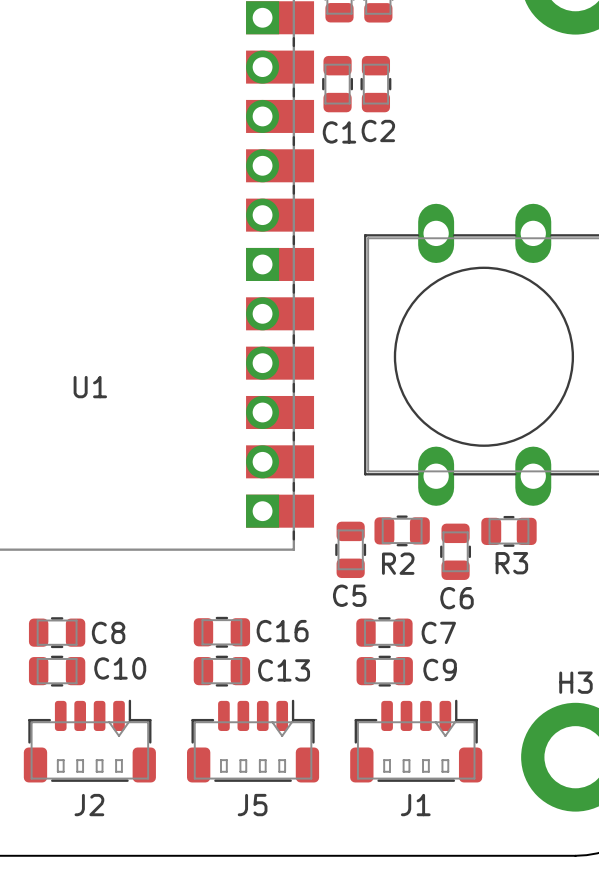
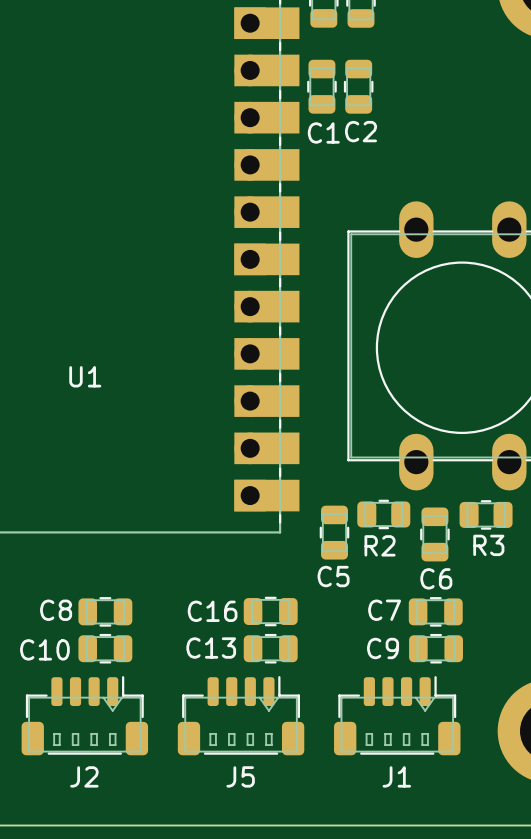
C16 name position: C16 (282, 631) -> C16 (212, 611)
C8 position: (57, 632) -> (105, 611)
C8 name position: C8 (108, 632) -> C8 (56, 610)
C16 position: (221, 632) -> (270, 611)
C7 position: (384, 632) -> (435, 611)
C7 name position: C7 (438, 632) -> C7 (384, 610)
C10 name position: C10 (120, 668) -> C10 (44, 649)
C9 name position: C9 (440, 669) -> C9 (383, 648)
C13 name position: C13 (284, 670) -> C13 (211, 648)
C10 position: (57, 671) -> (105, 648)
C13 position: (221, 671) -> (270, 648)
C9 position: (384, 671) -> (436, 648)

